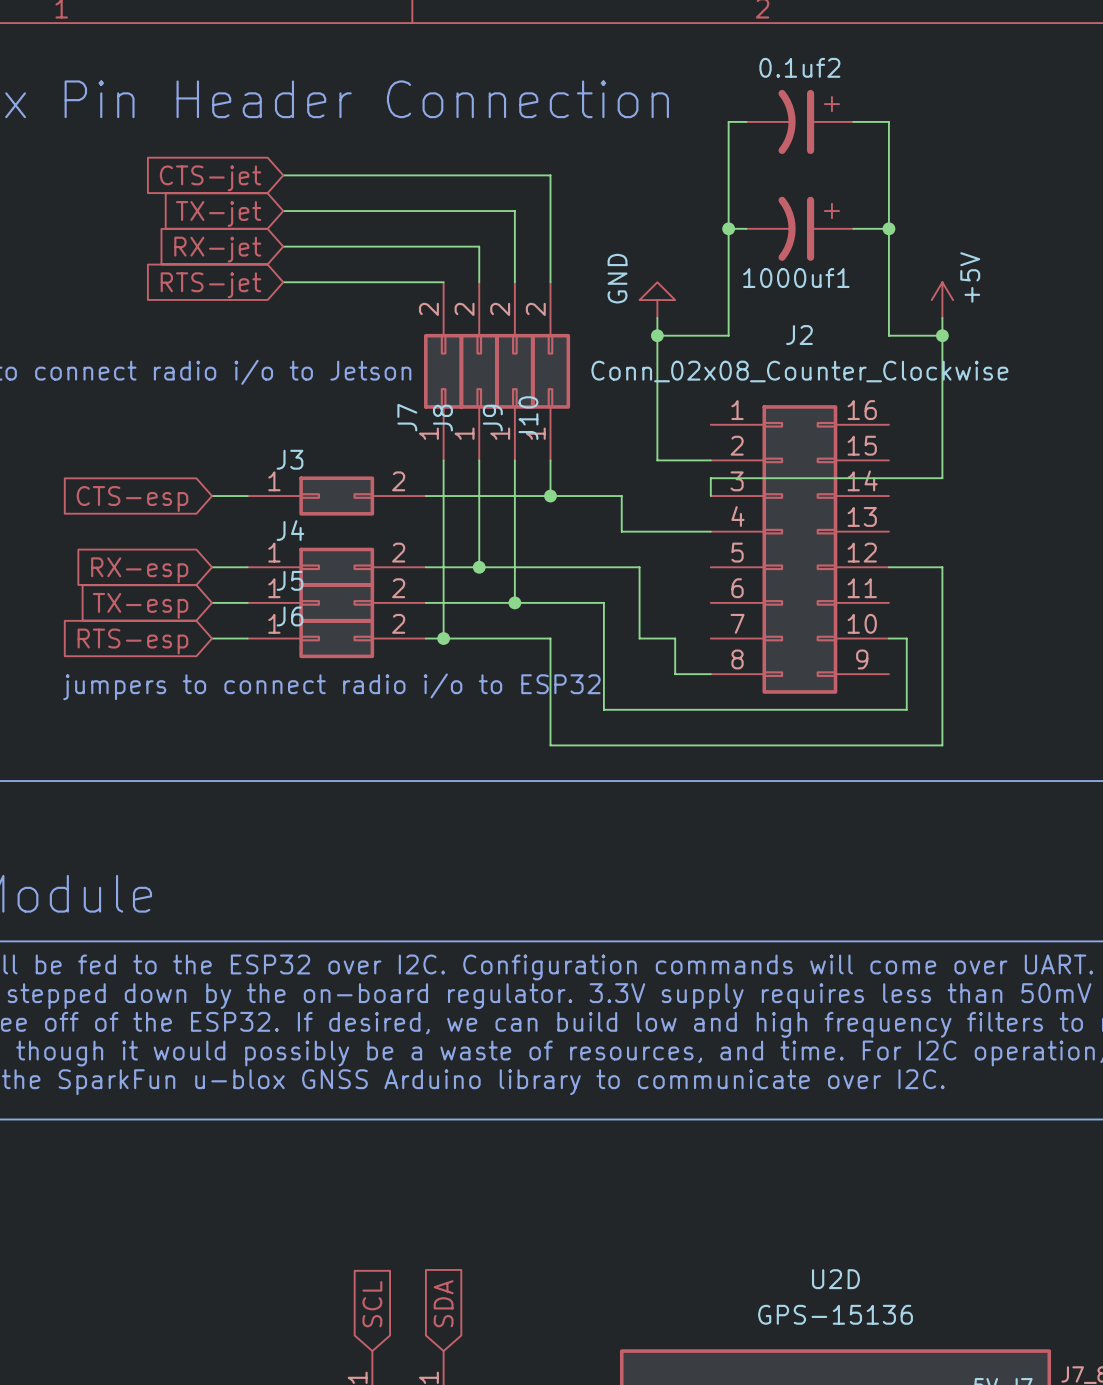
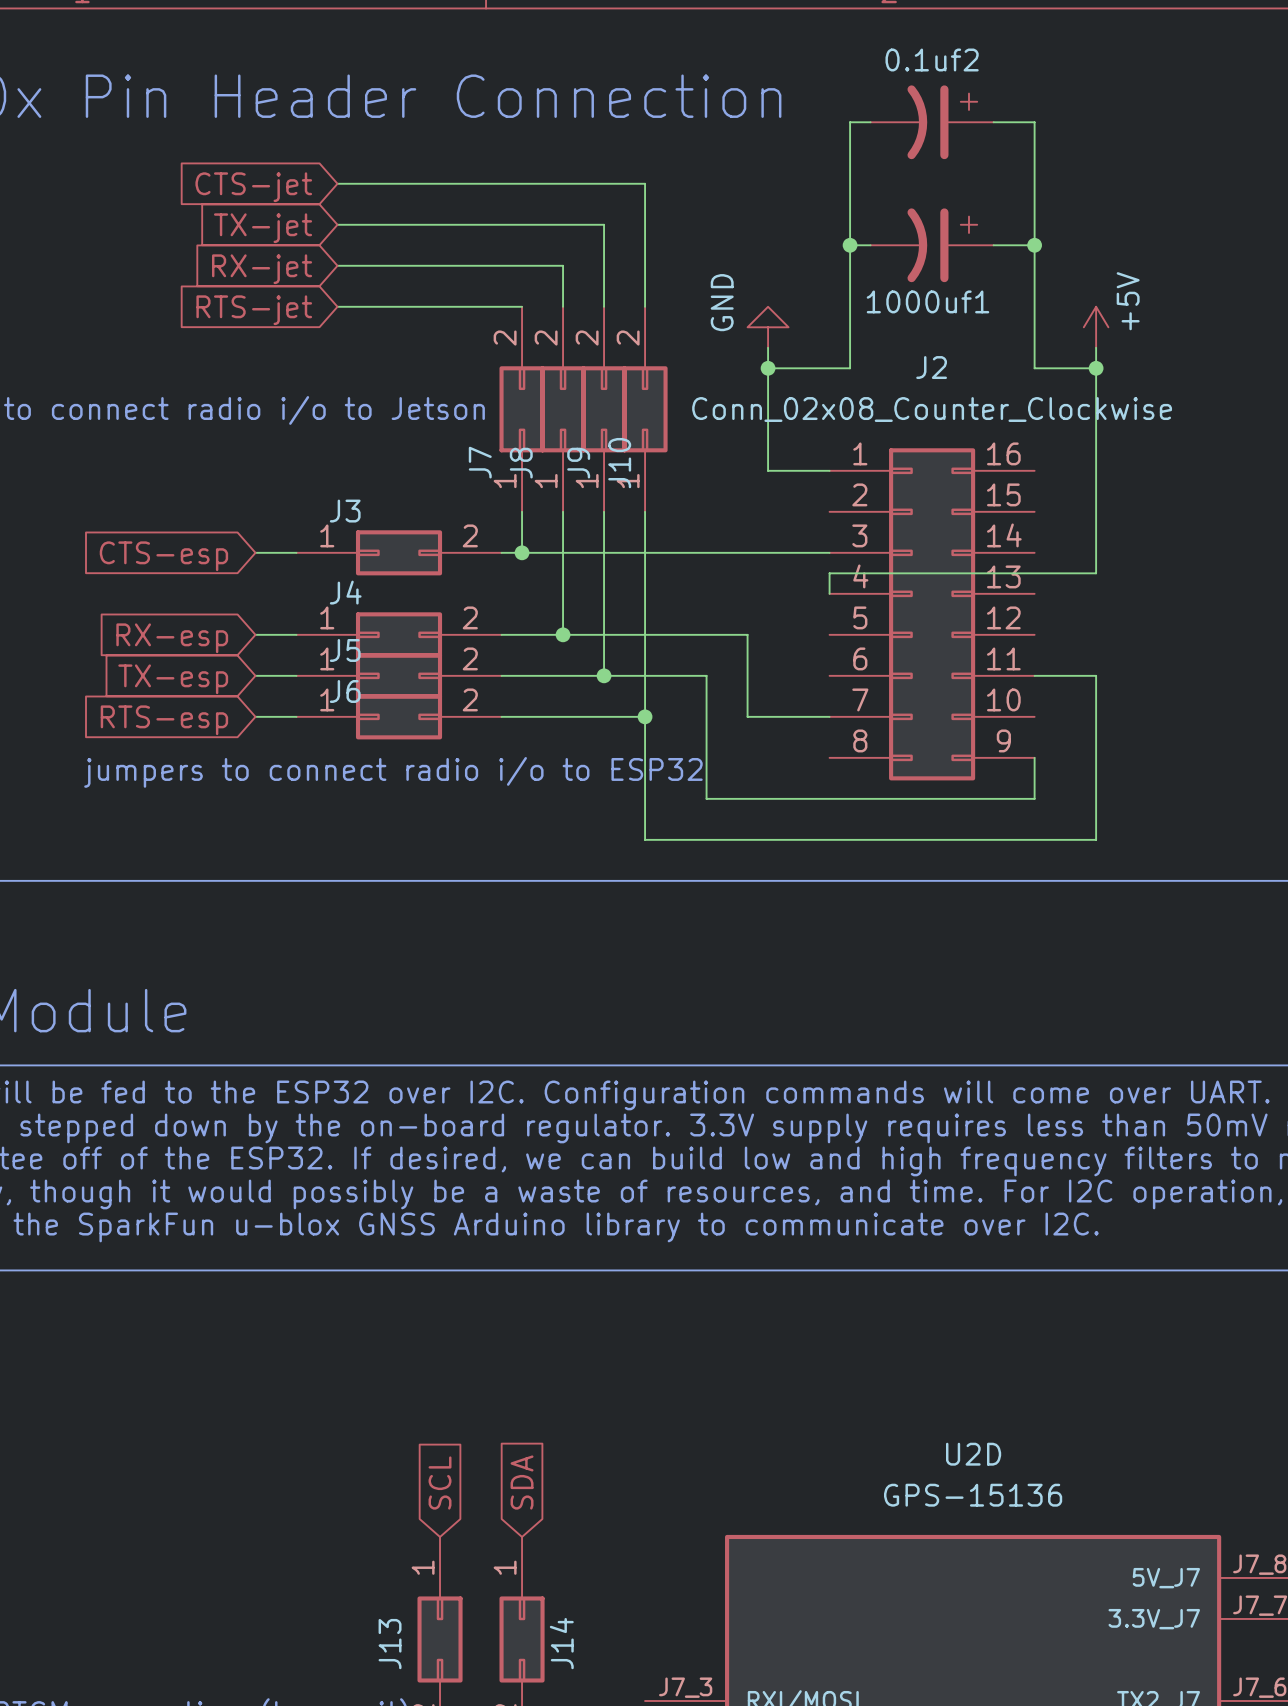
wire: (657, 424) (657, 460) (710, 460) -> (768, 470) (829, 470)
wire: (942, 478) (710, 478) (710, 496) -> (1096, 532) (1096, 573) (829, 573) (829, 593)
wire: (443, 496) (443, 638) -> (645, 552) (645, 716)
junction: none -> (522, 552)
junction: (550, 496) -> none
wire: (621, 496) (621, 531) (710, 531) -> (727, 552) (829, 552)
wire: (888, 567) (942, 567) (942, 602) -> (1034, 675) (1096, 675)
junction: (443, 638) -> none
junction: none -> (645, 716)
wire: (675, 638) (675, 674) (710, 674) -> (788, 716) (829, 716)
wire: (888, 638) (906, 638) (906, 709) (888, 709) -> (1034, 757) (1034, 798)

